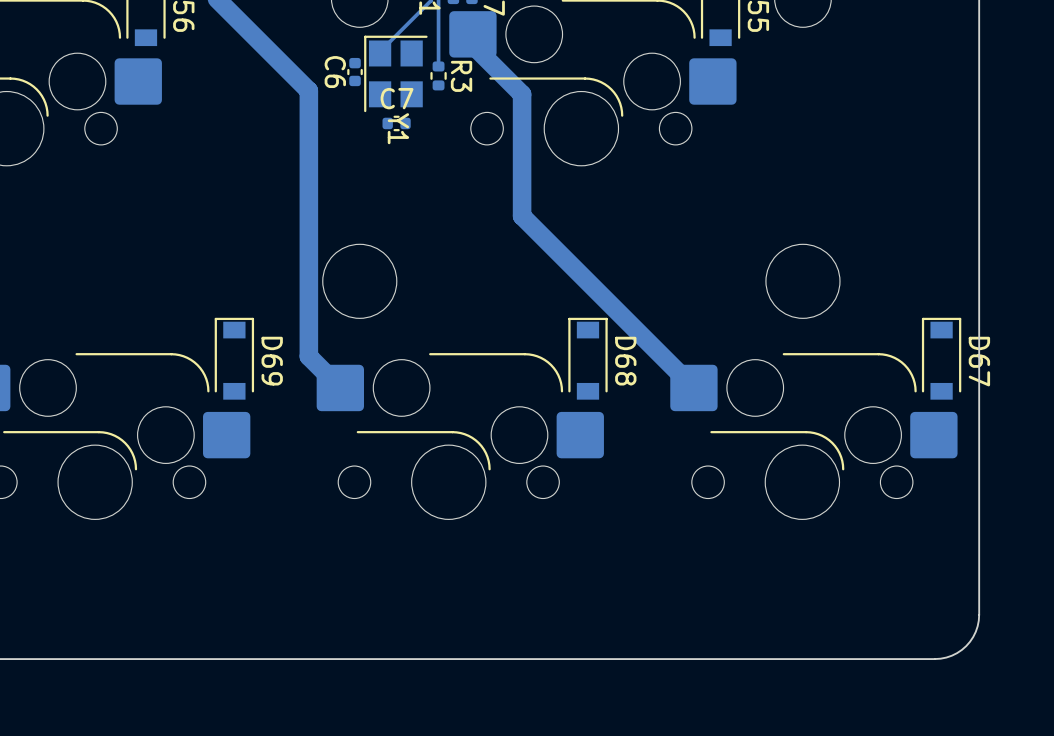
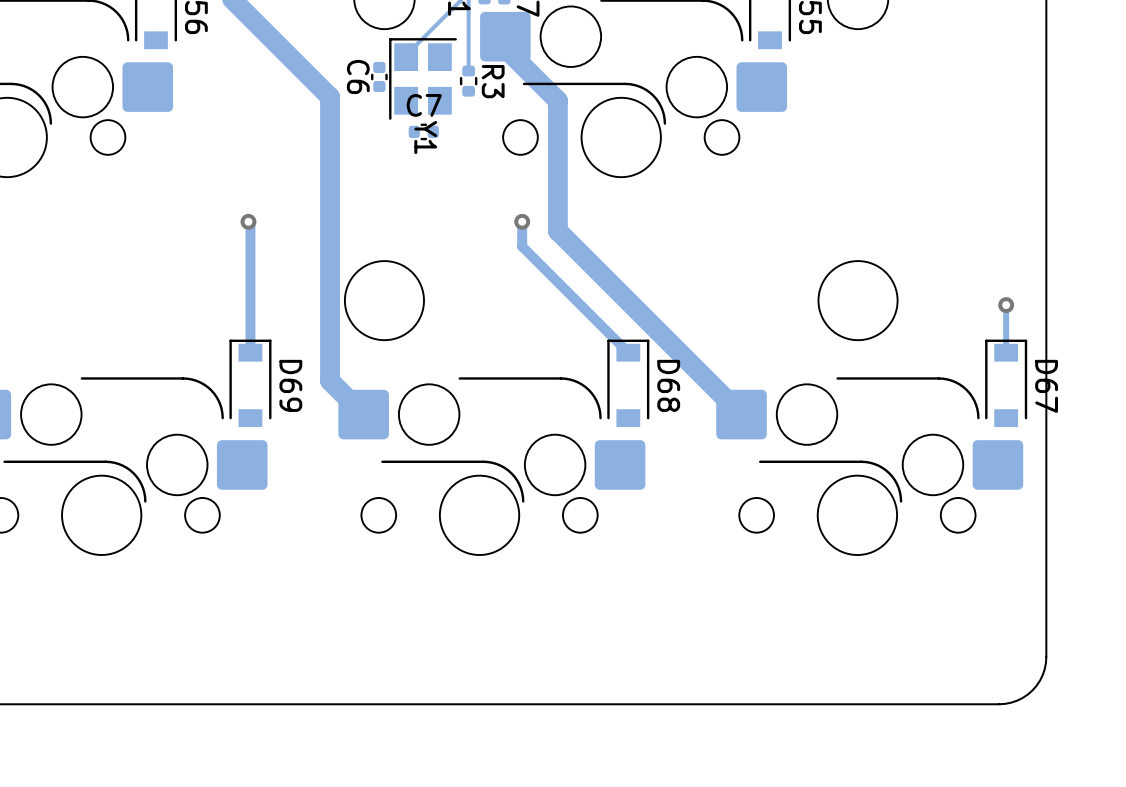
track: none -> (248, 221) (250, 223) (250, 352)
via: none -> (248, 221)
track: none -> (522, 221) (522, 246) (628, 352)
via: none -> (522, 221)
track: none -> (1006, 305) (1006, 352)
via: none -> (1006, 305)

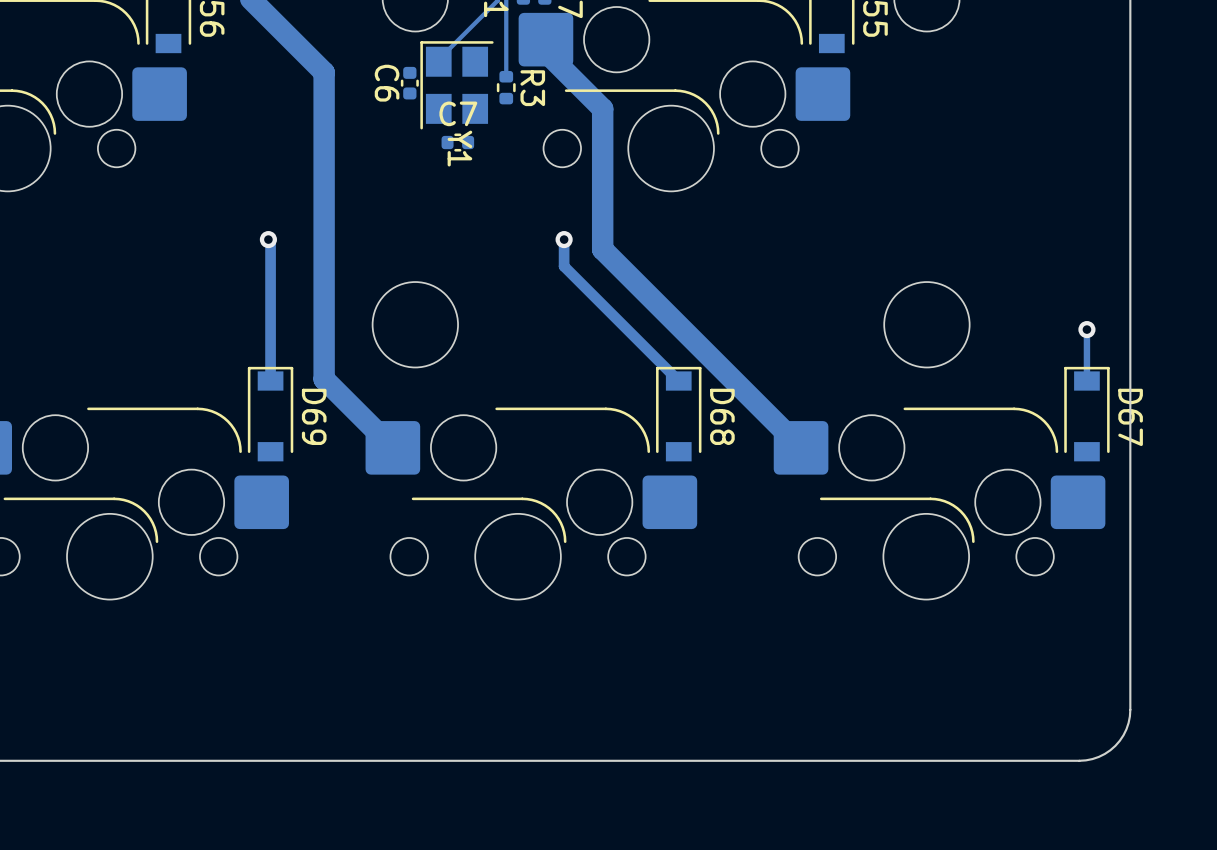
track: (300, 67) (330, 97) (330, 380) -> (324, 72) (324, 379) (356, 411)

